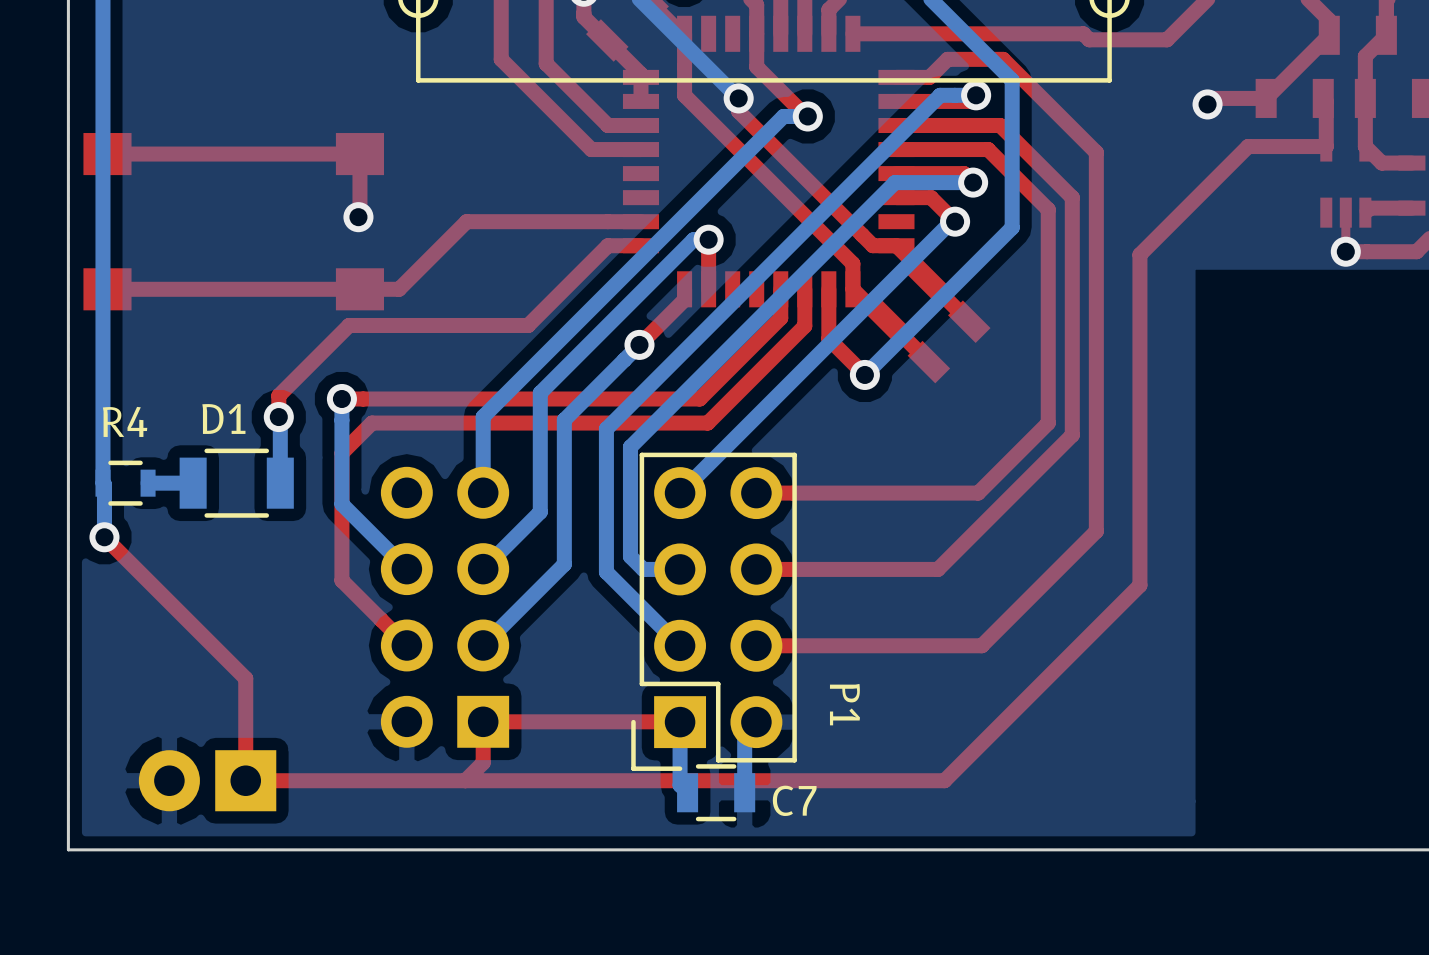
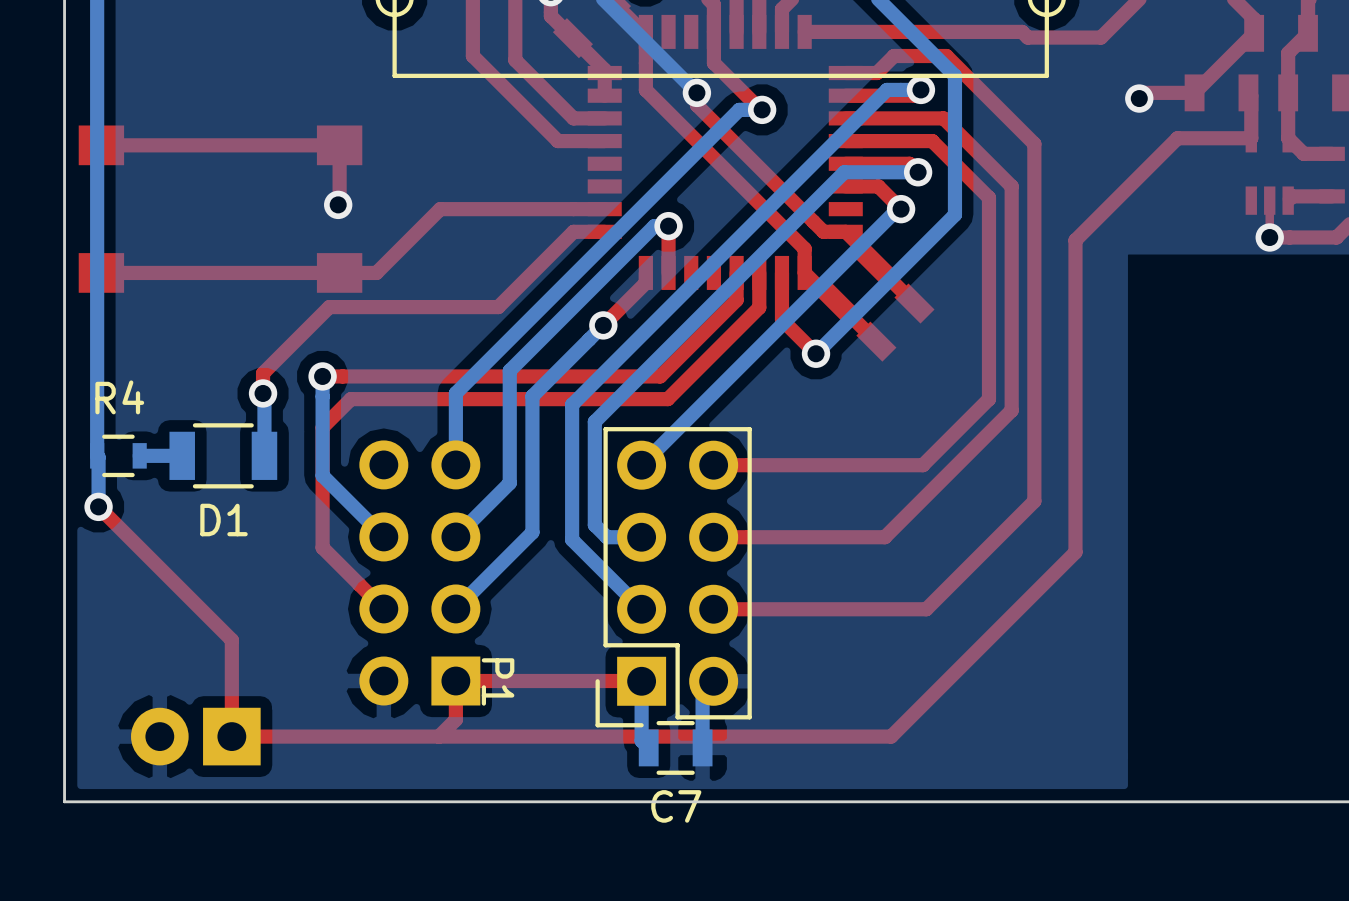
D1 name position: D1 (223, 418) -> D1 (224, 520)
P1 name position: P1 (844, 704) -> P1 (498, 681)
C7 name position: C7 (794, 800) -> C7 (676, 806)

